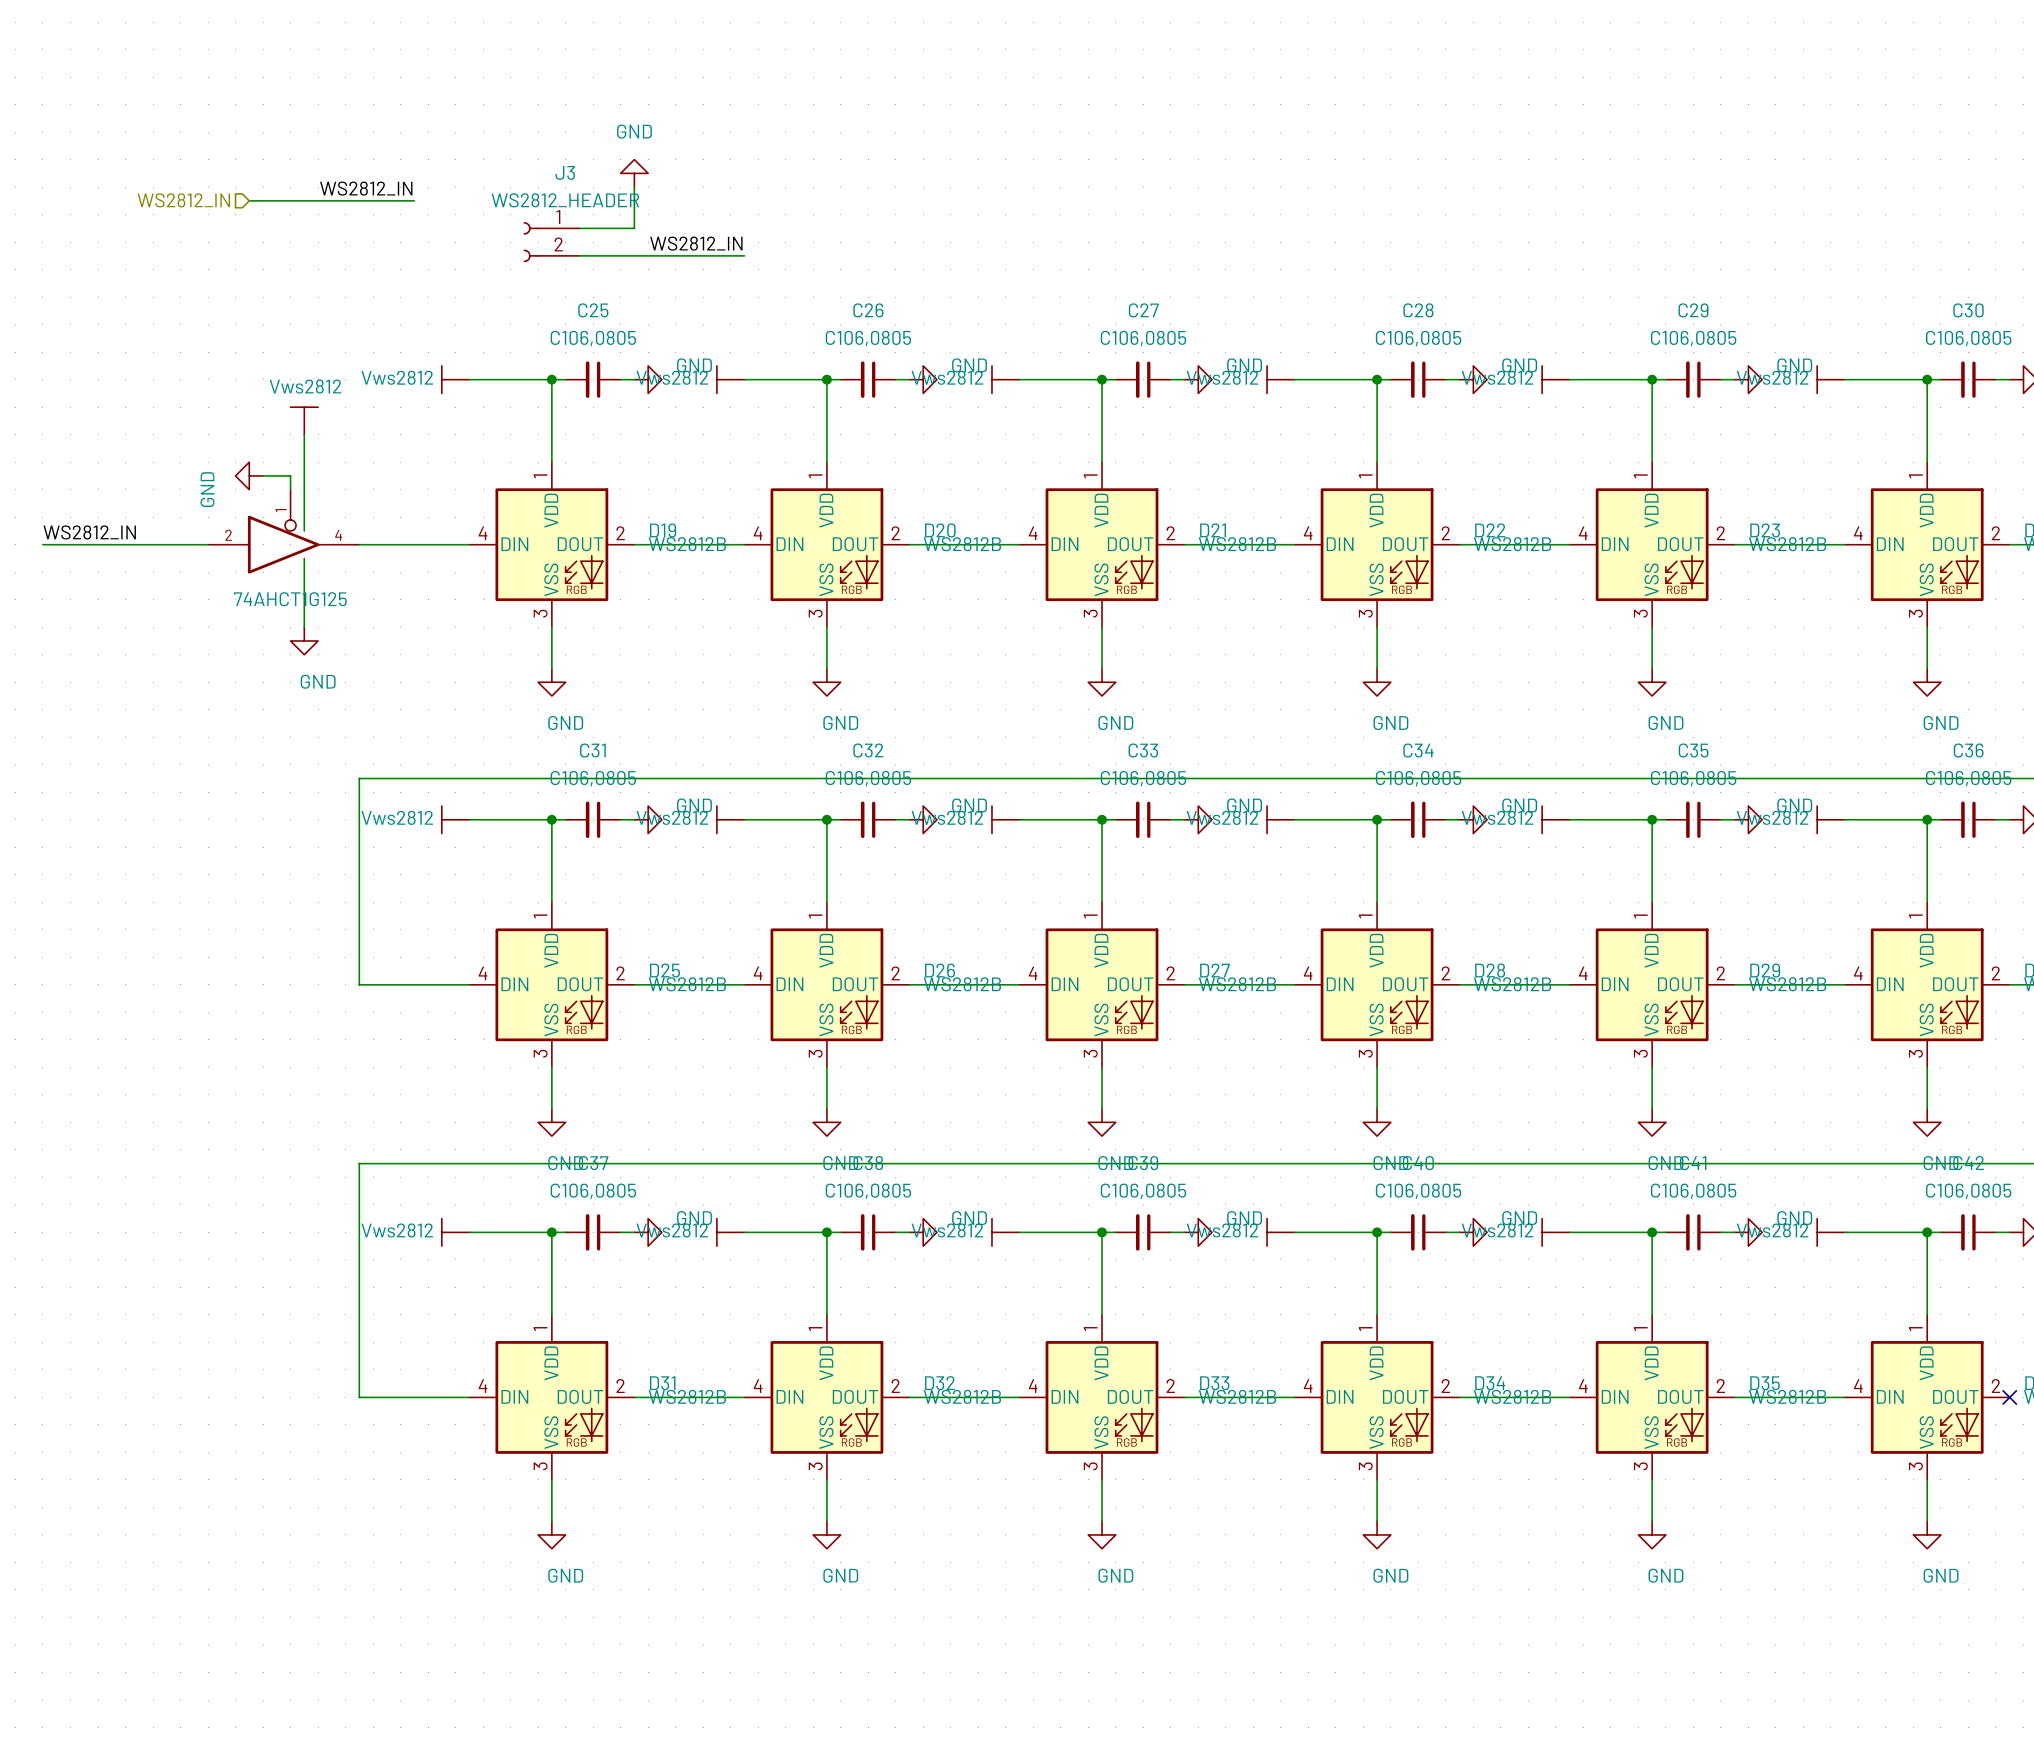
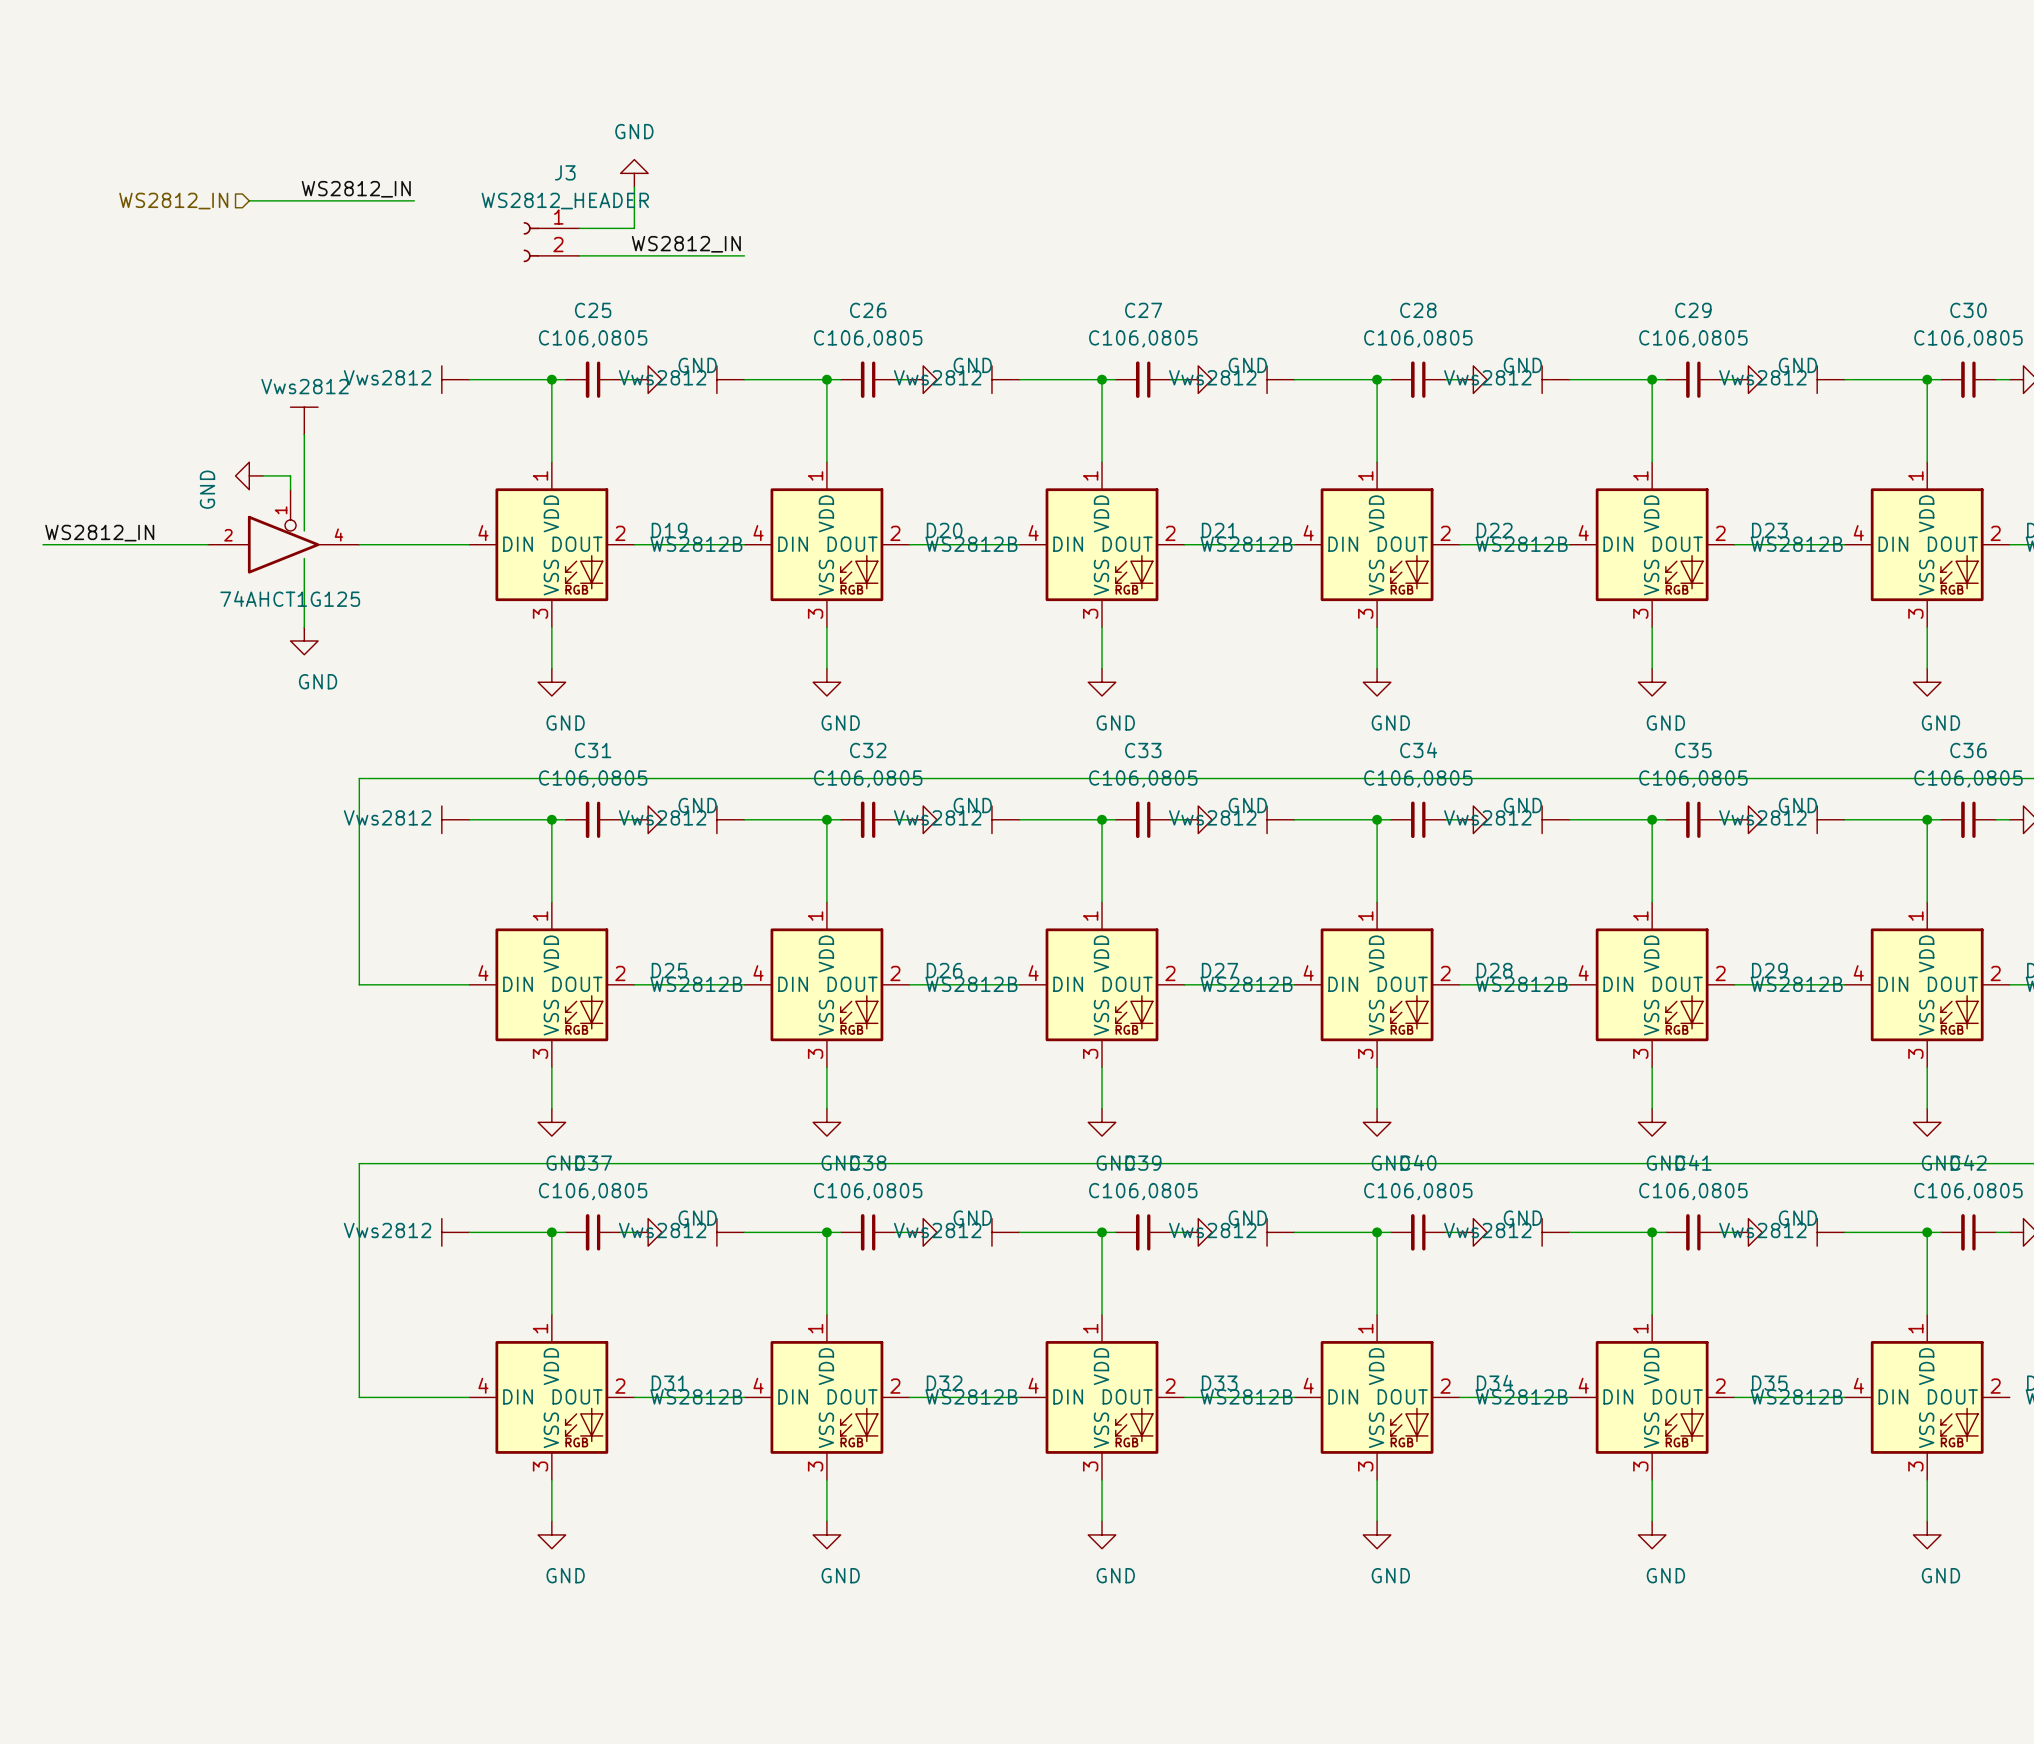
no-connect mark: (2009, 1397) -> none

